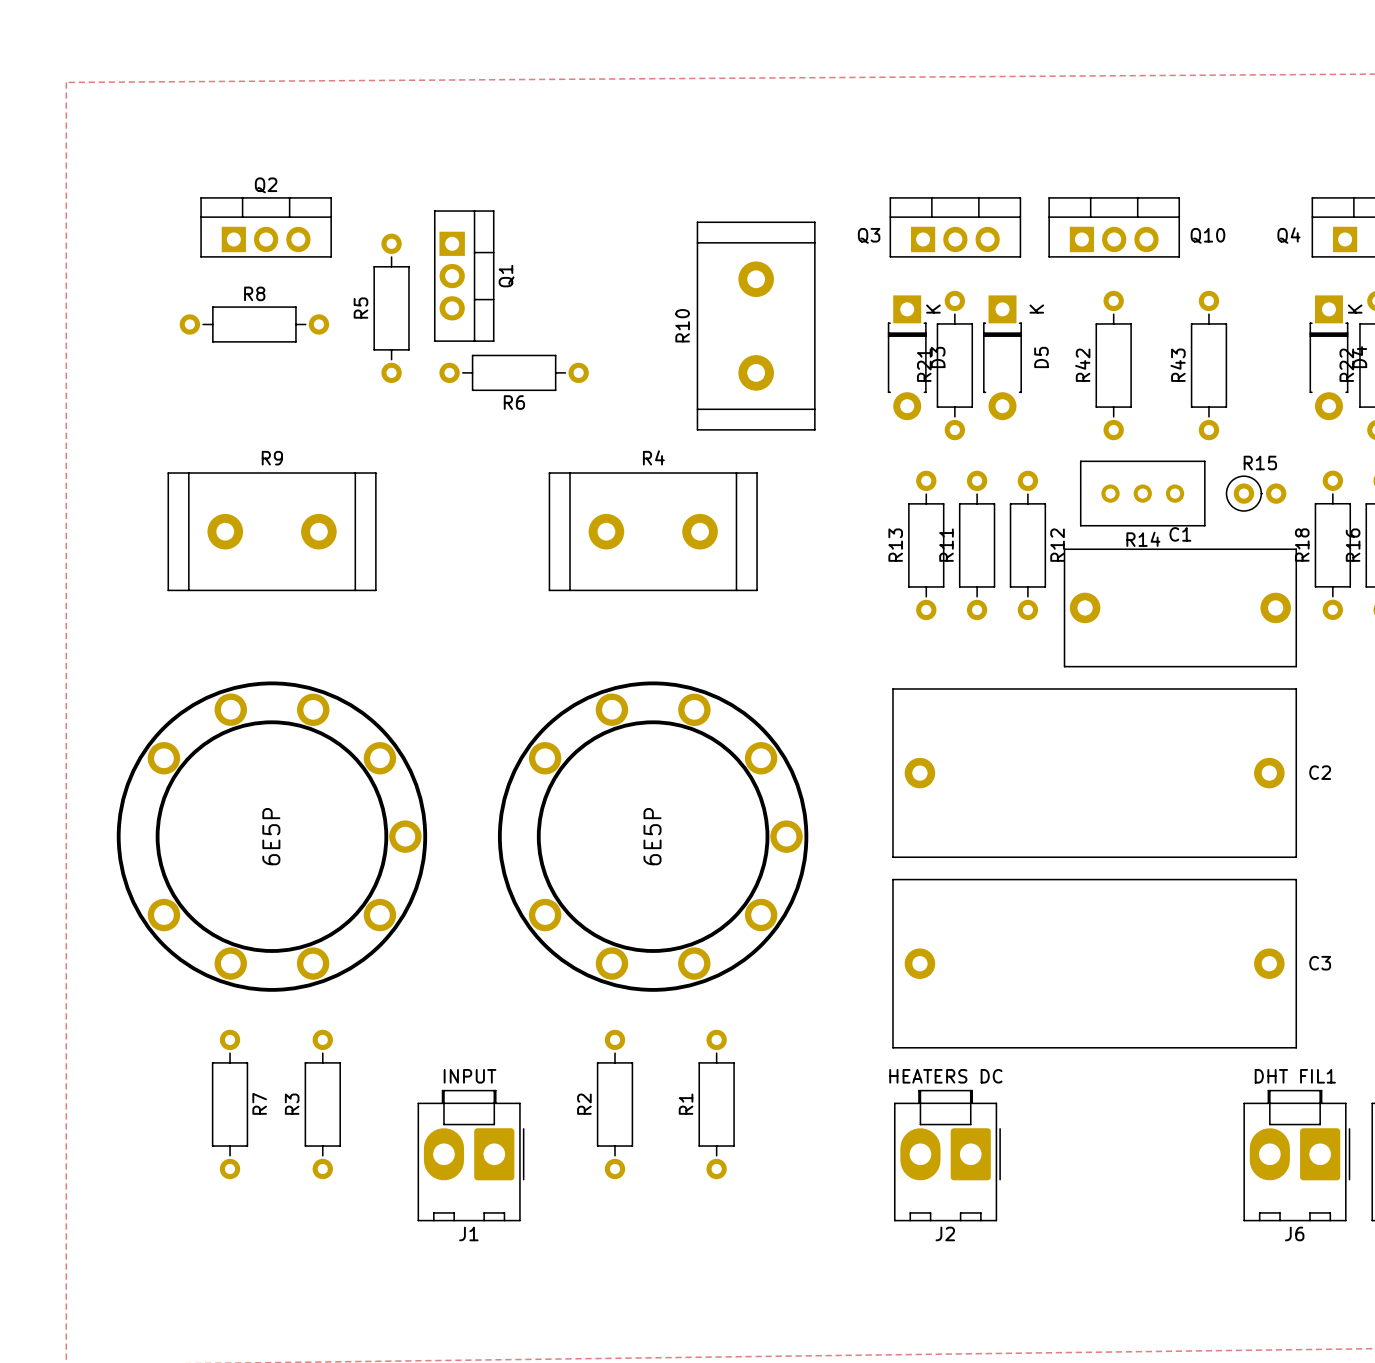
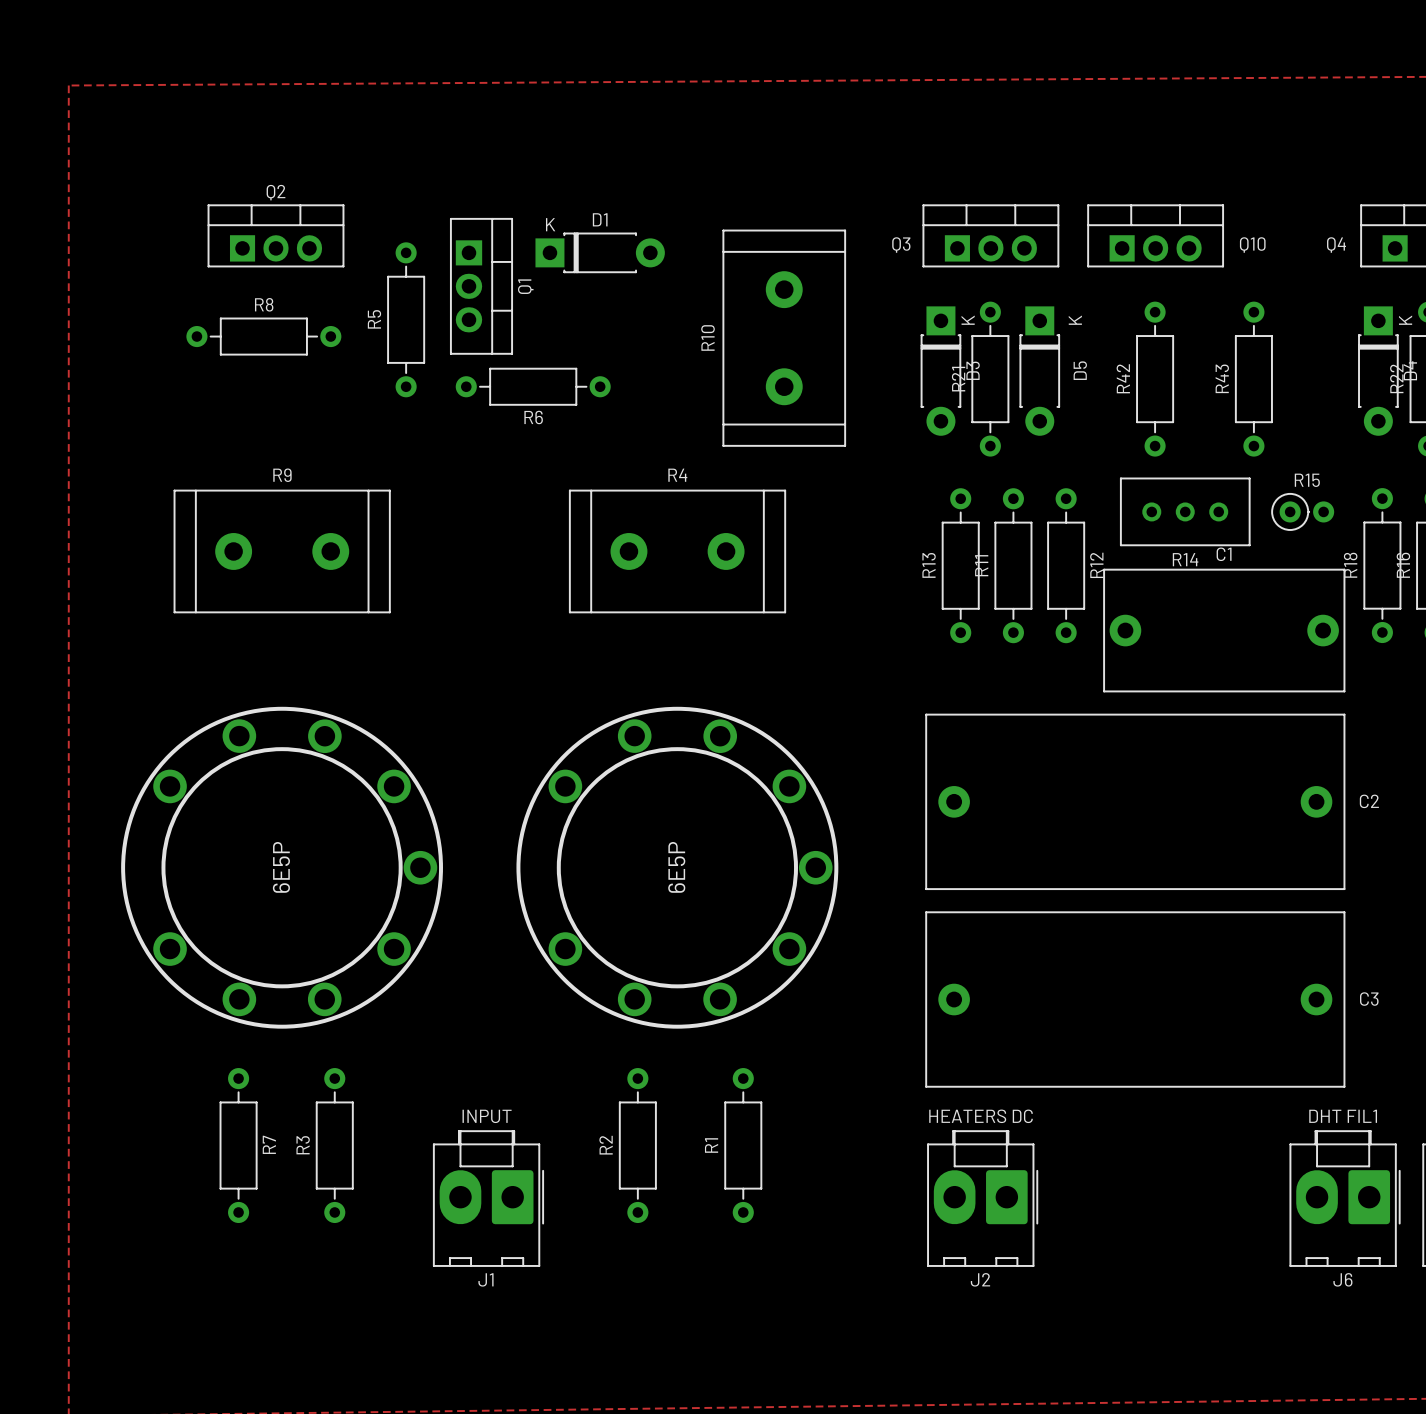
D1: none -> (600, 252)

